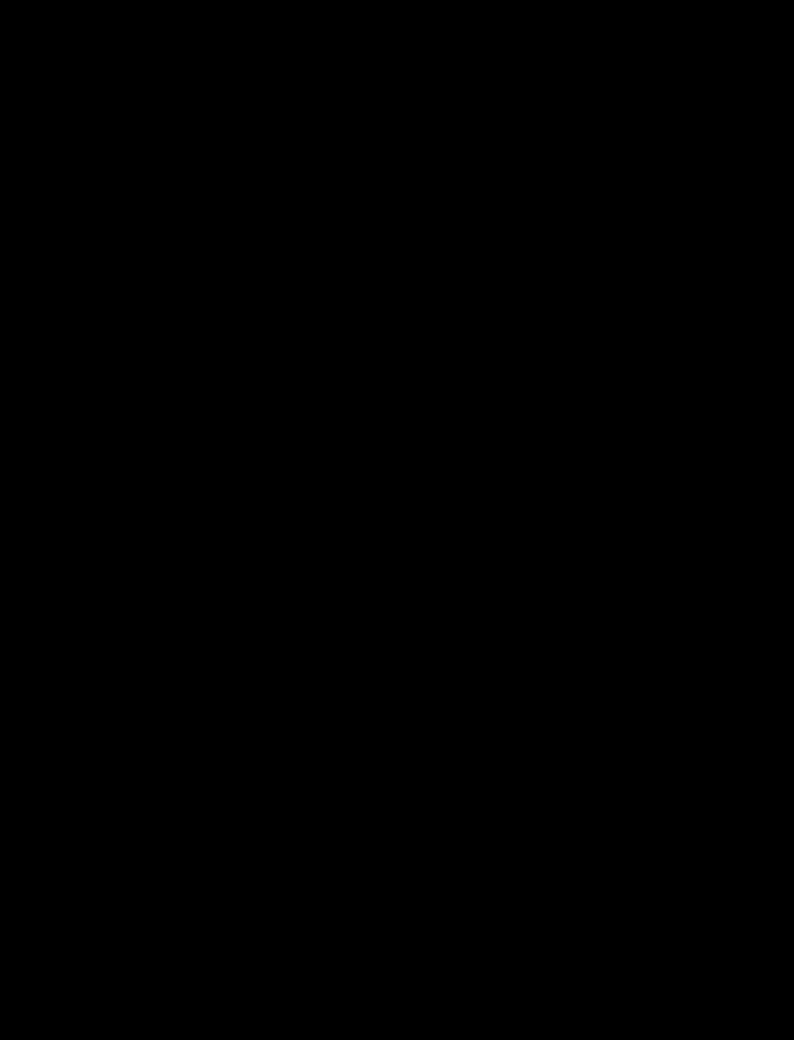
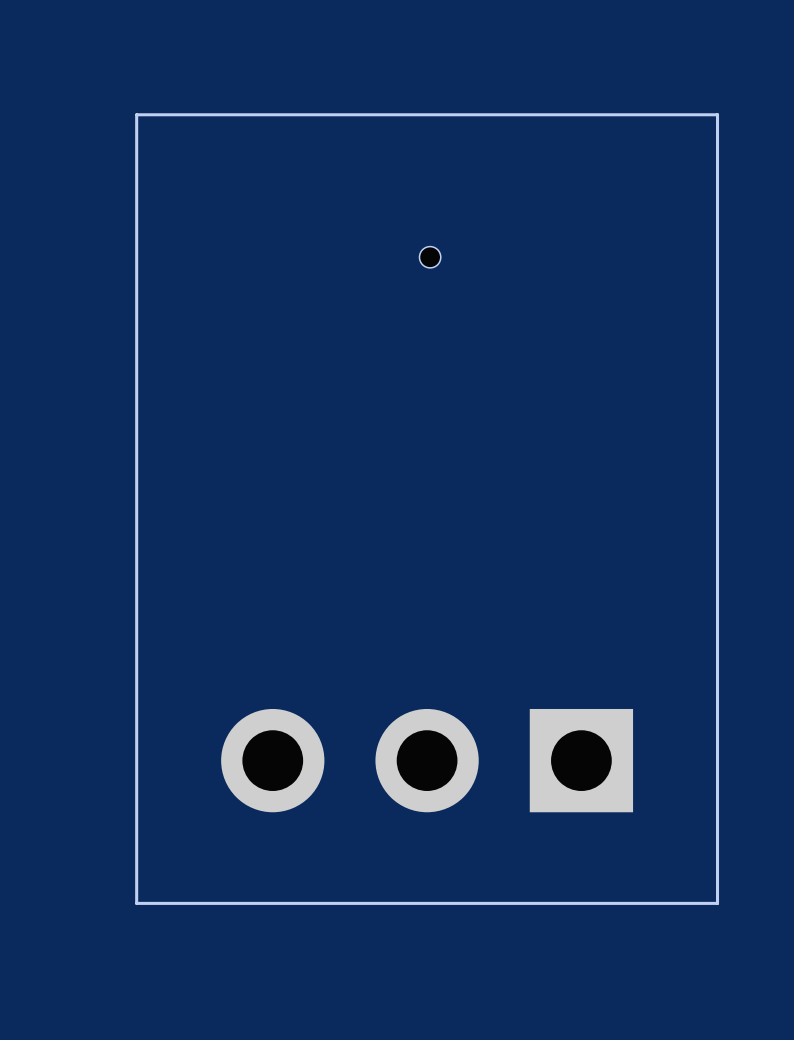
board edge: none -> (717, 114) (136, 114) (136, 903) (717, 903) (717, 114)
part: none -> (430, 257)
part: none -> (427, 760)

